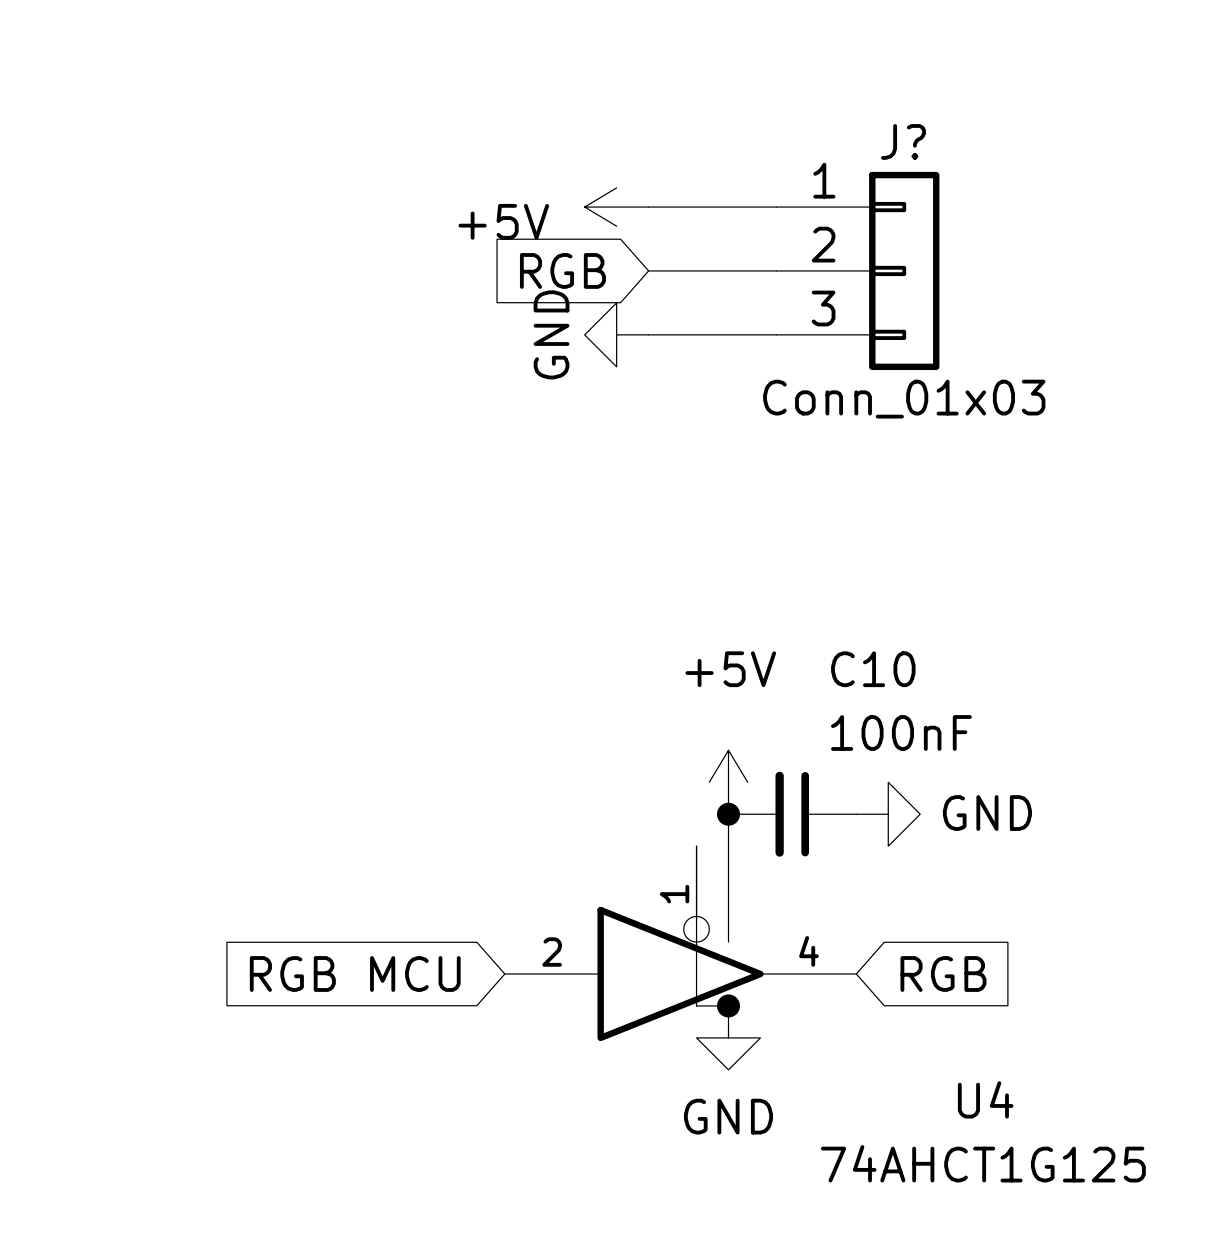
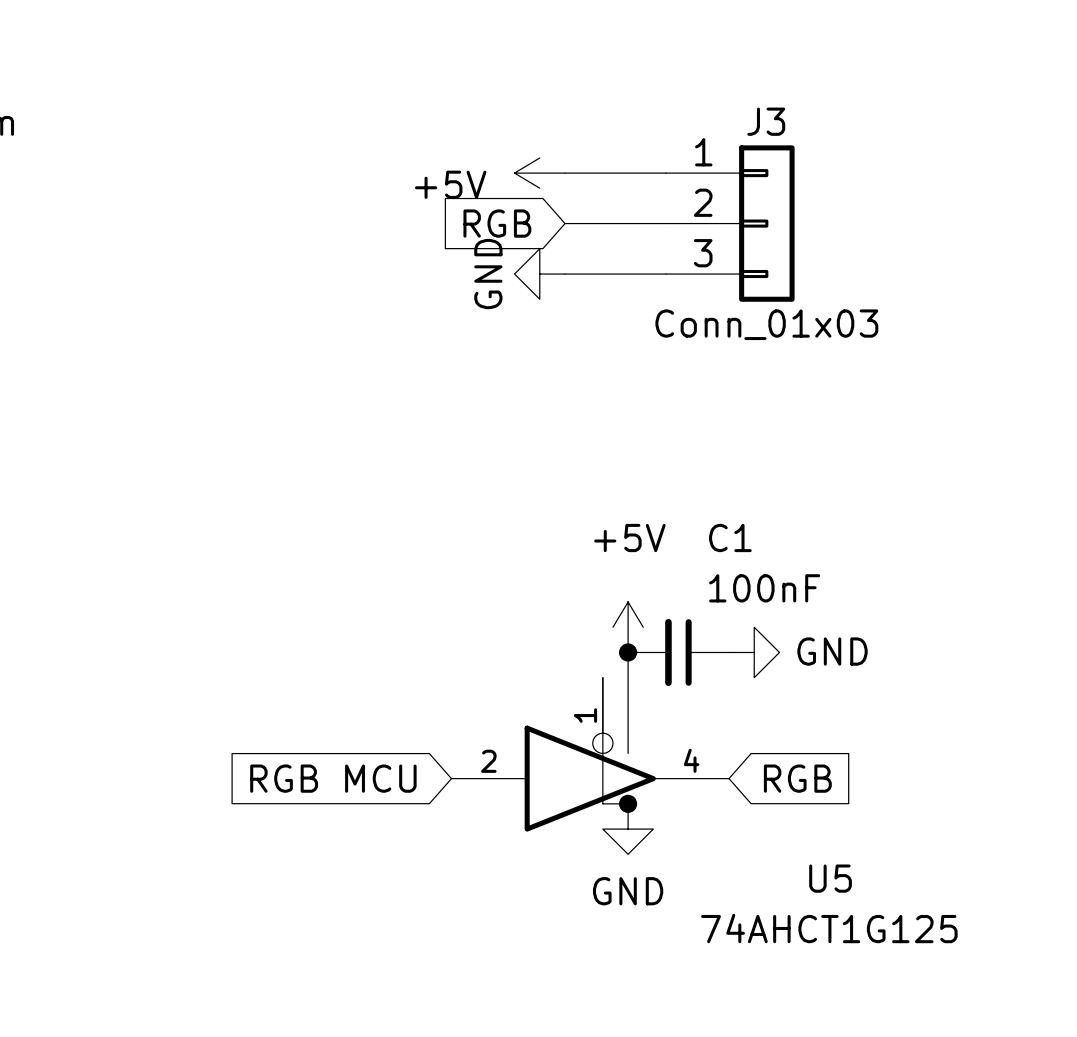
J? name: J? (903, 141) -> J3 (766, 121)
C10 name: C10 (873, 669) -> C1 (730, 538)
U4 name: U4 (985, 1099) -> U5 (830, 878)

